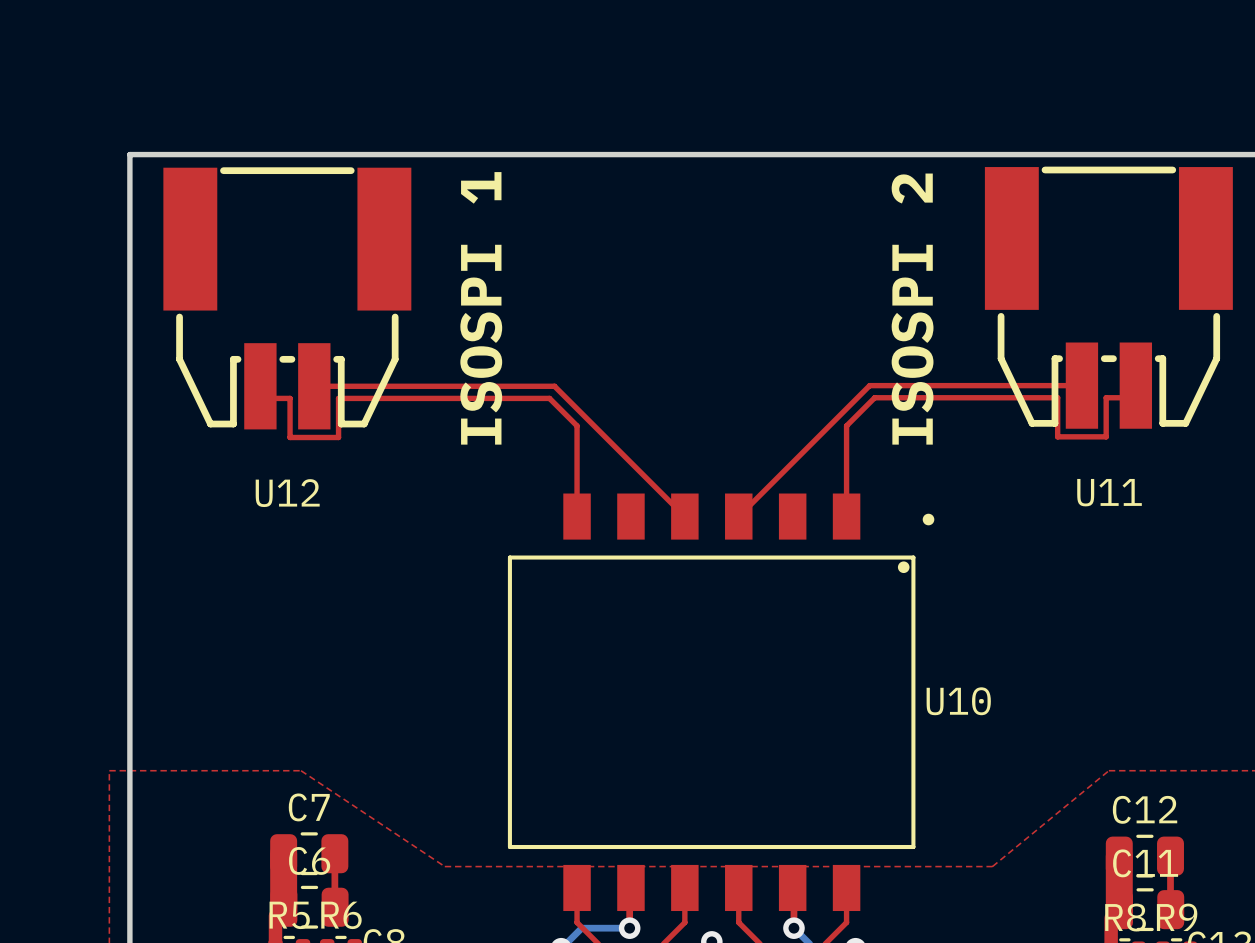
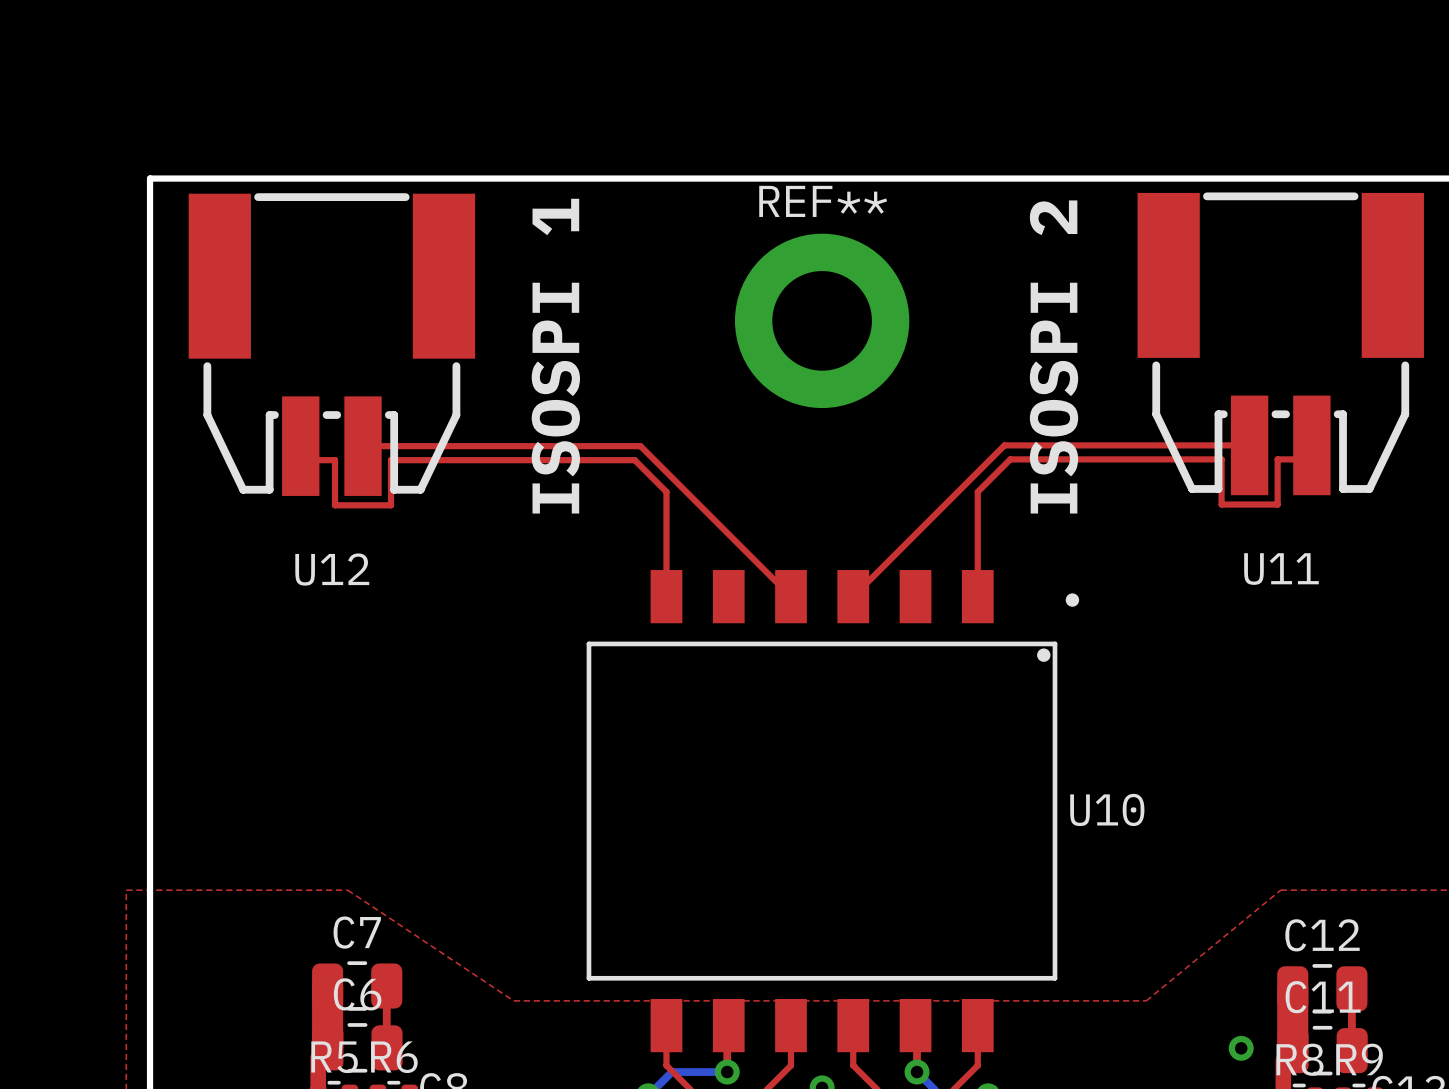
REF**: none -> (822, 320)
via: none -> (1241, 1048)

